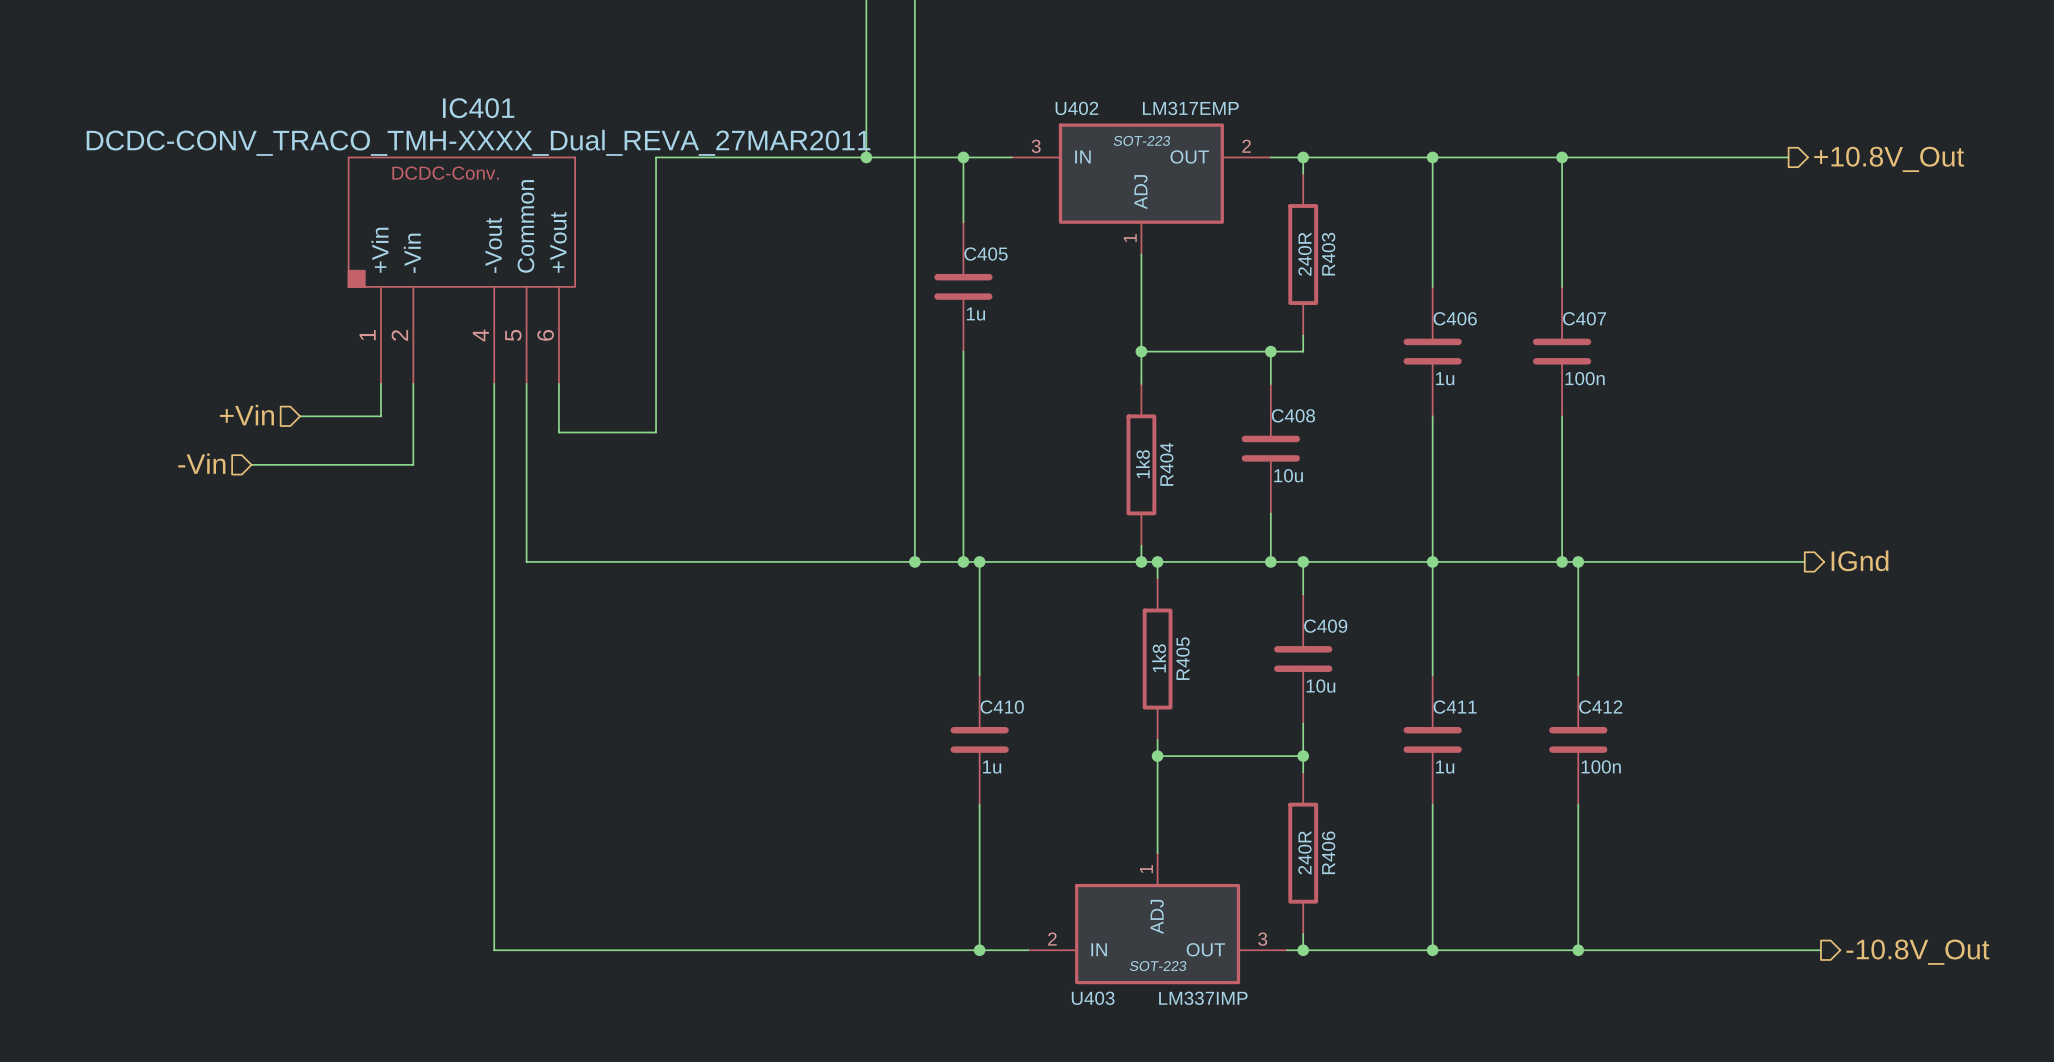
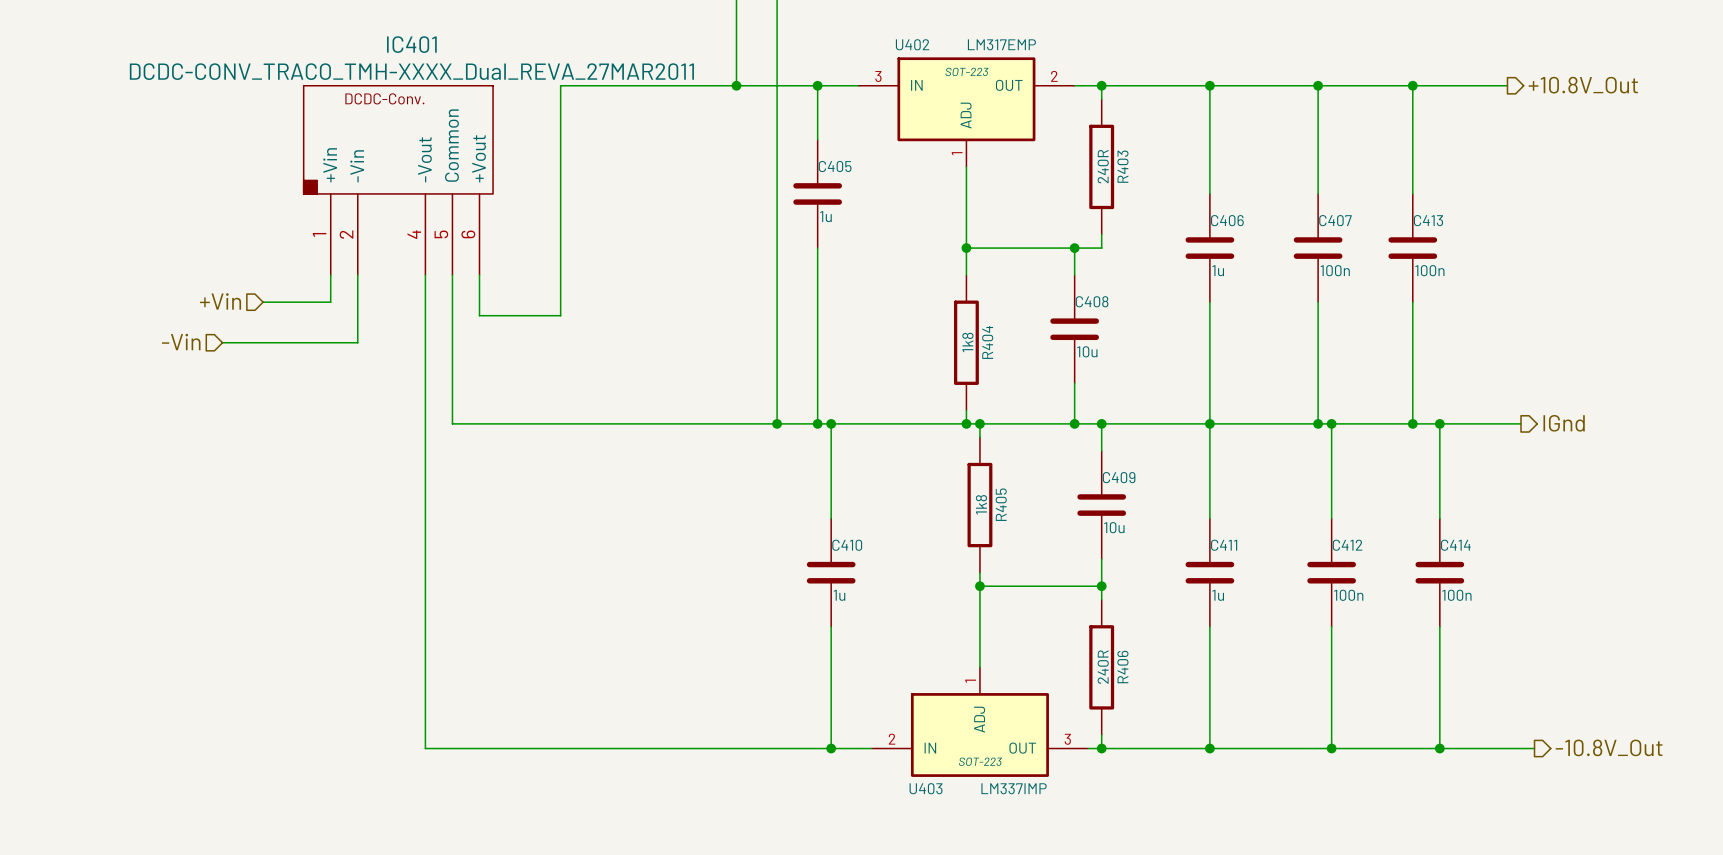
wire: none -> (1412, 85) (1412, 193)
junction: none -> (1412, 85)
C413: none -> 100n (1412, 248)
wire: none -> (1412, 302) (1412, 423)
junction: none -> (1412, 423)
wire: none -> (1439, 423) (1439, 518)
junction: none -> (1439, 423)
C414: none -> 100n (1439, 572)
wire: none -> (1439, 626) (1439, 748)
junction: none -> (1439, 748)

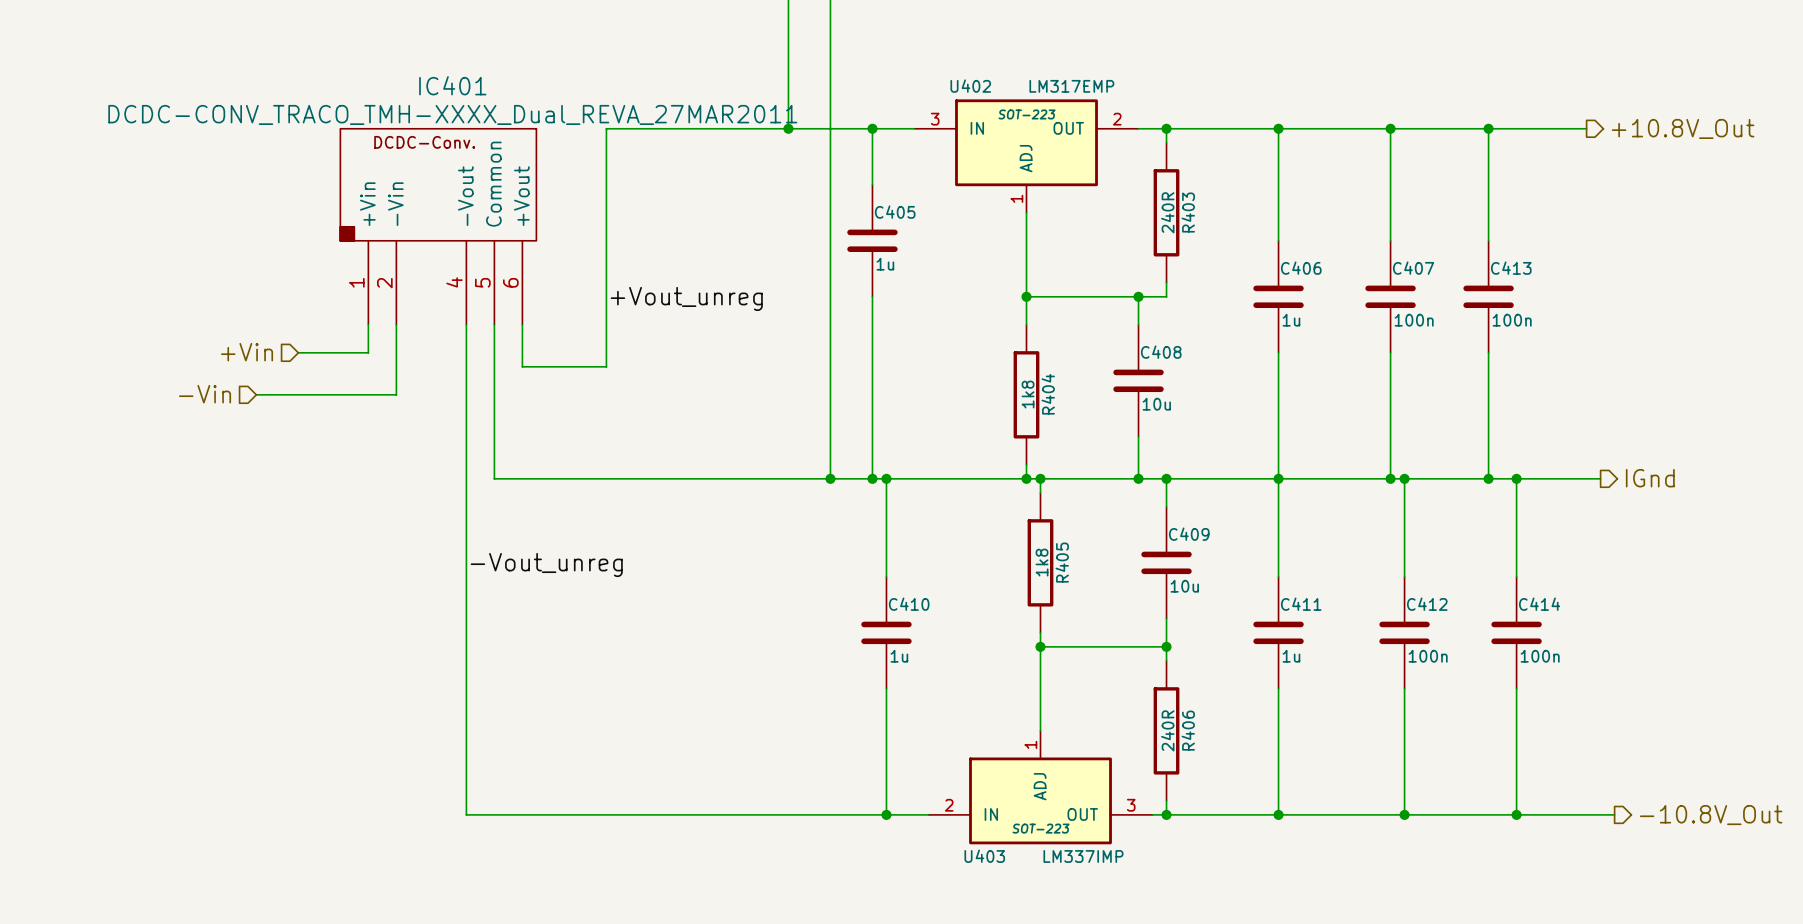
label: none -> +Vout_unreg (686, 298)
label: none -> -Vout_unreg (546, 565)

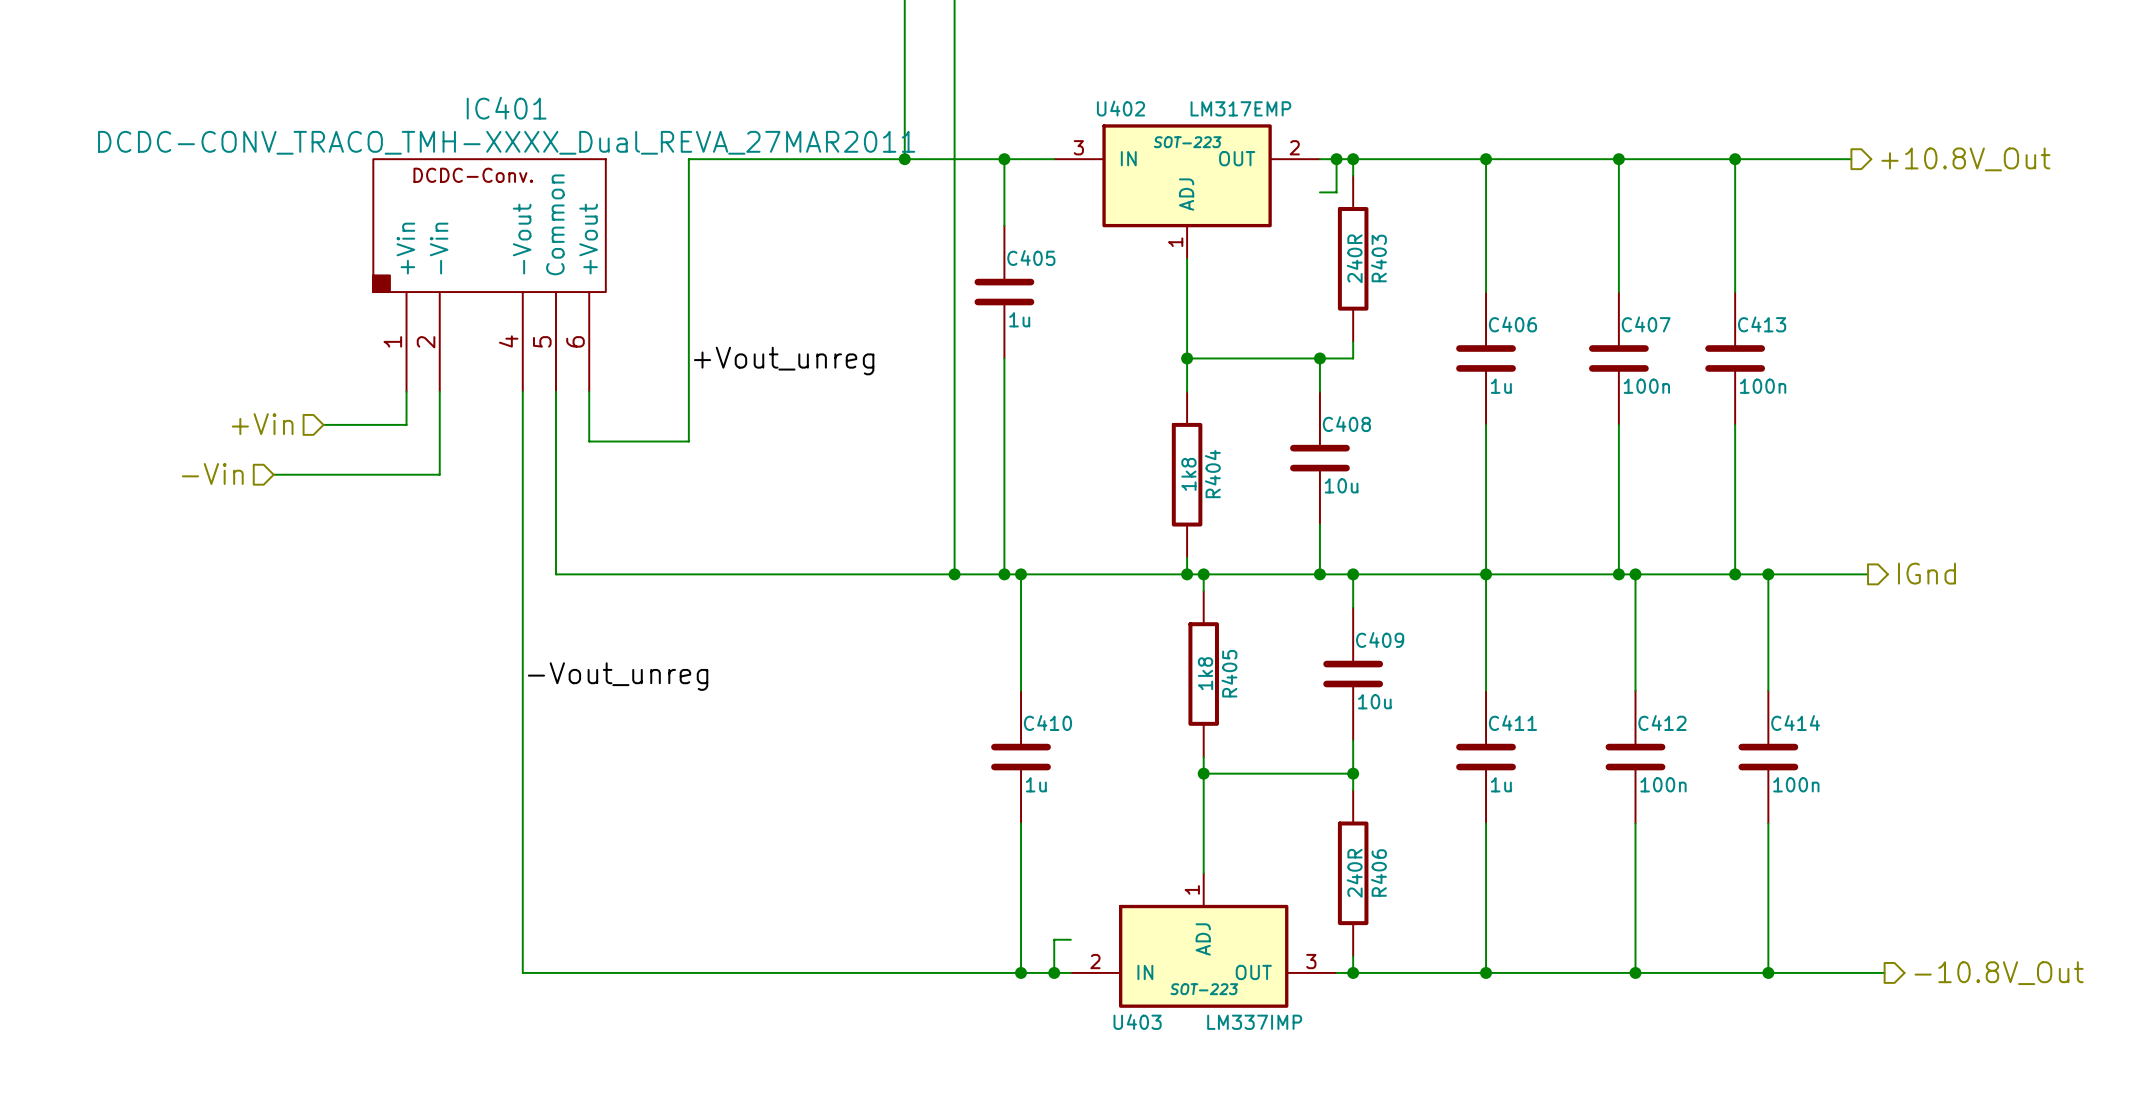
wire: none -> (1336, 159) (1336, 192) (1319, 192)
junction: none -> (1336, 159)
wire: none -> (1070, 939) (1054, 939) (1054, 972)
junction: none -> (1054, 972)

